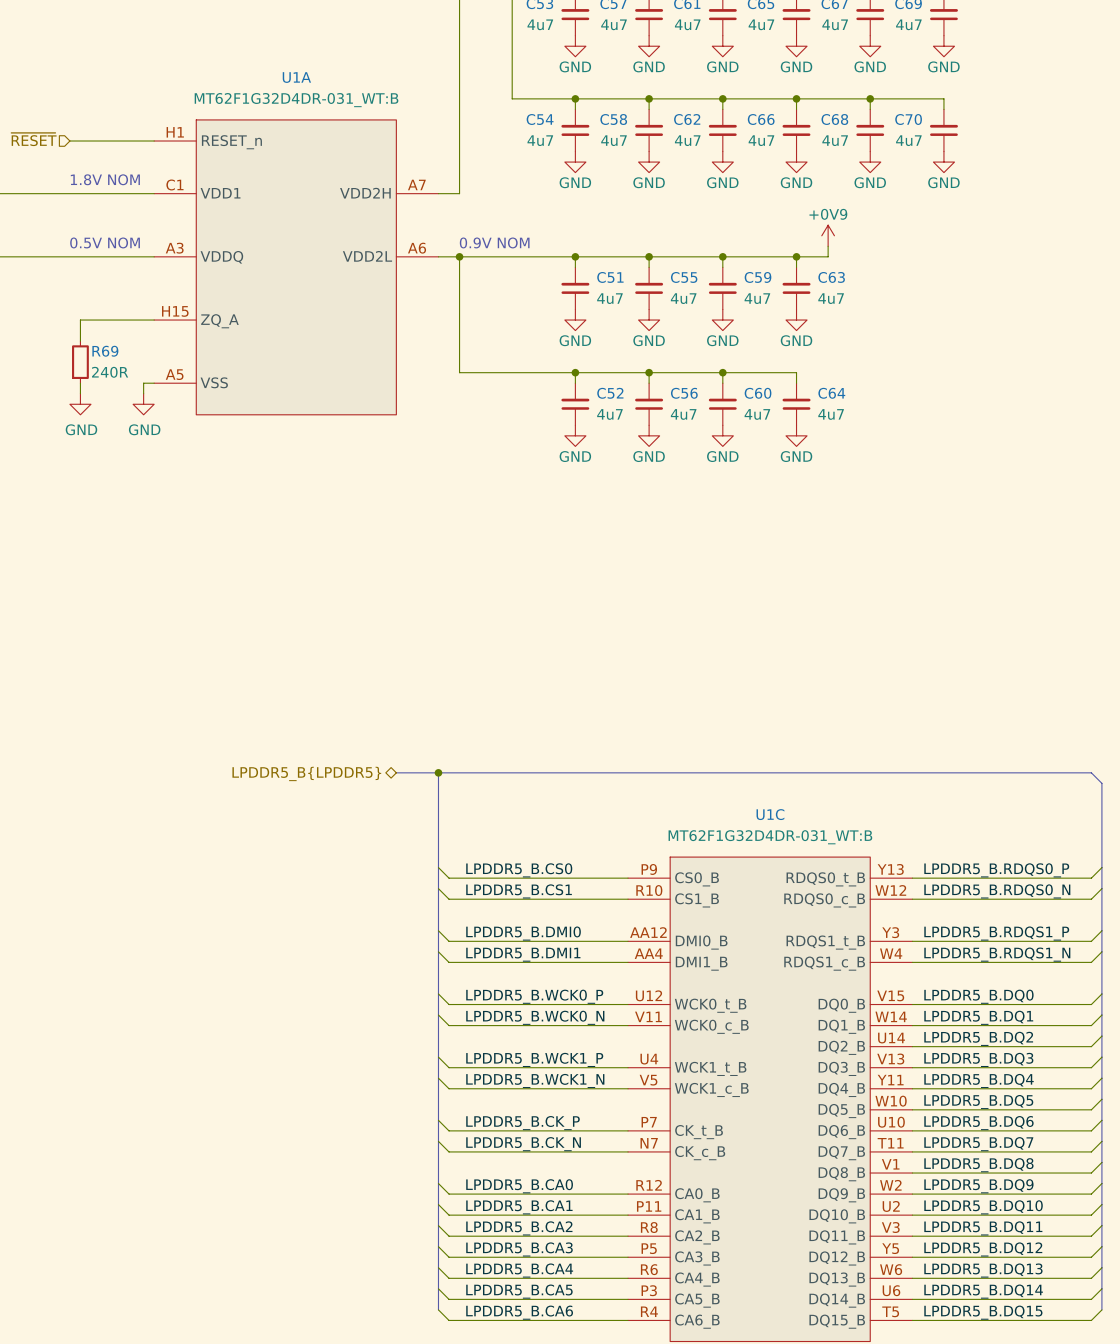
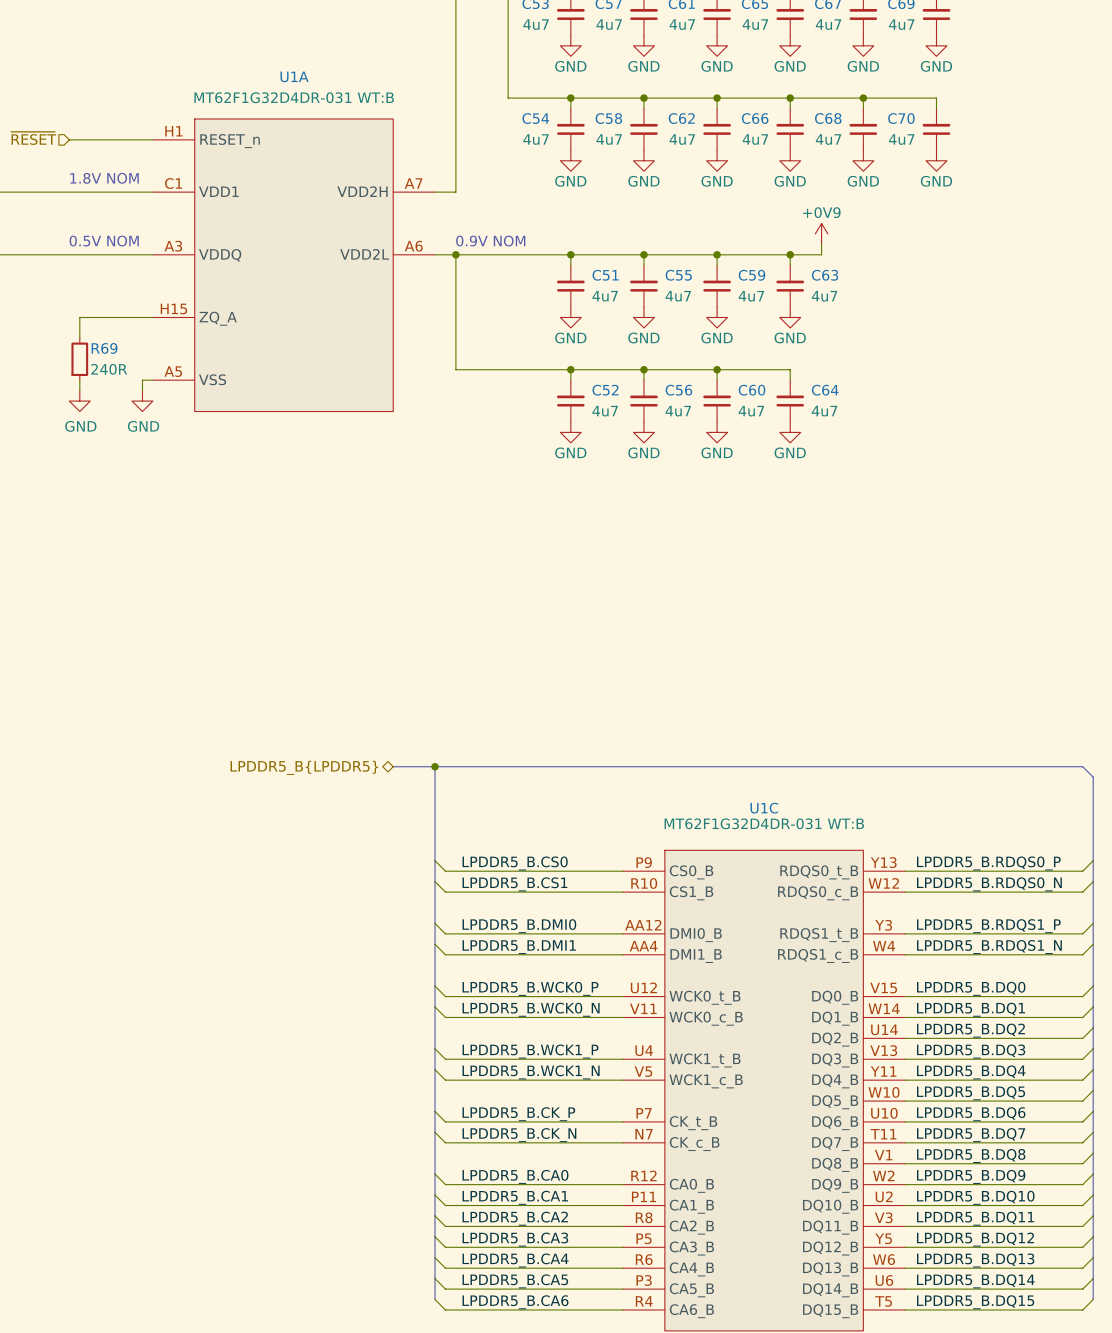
U1A text: none -> MT62F1G32D4DR-031 WT:B (294, 97)
U1A value: MT62F1G32D4DR-031_WT:B (296, 100) -> none
U1C text: none -> MT62F1G32D4DR-031 WT:B (764, 823)
U1C value: MT62F1G32D4DR-031_WT:B (770, 837) -> none

